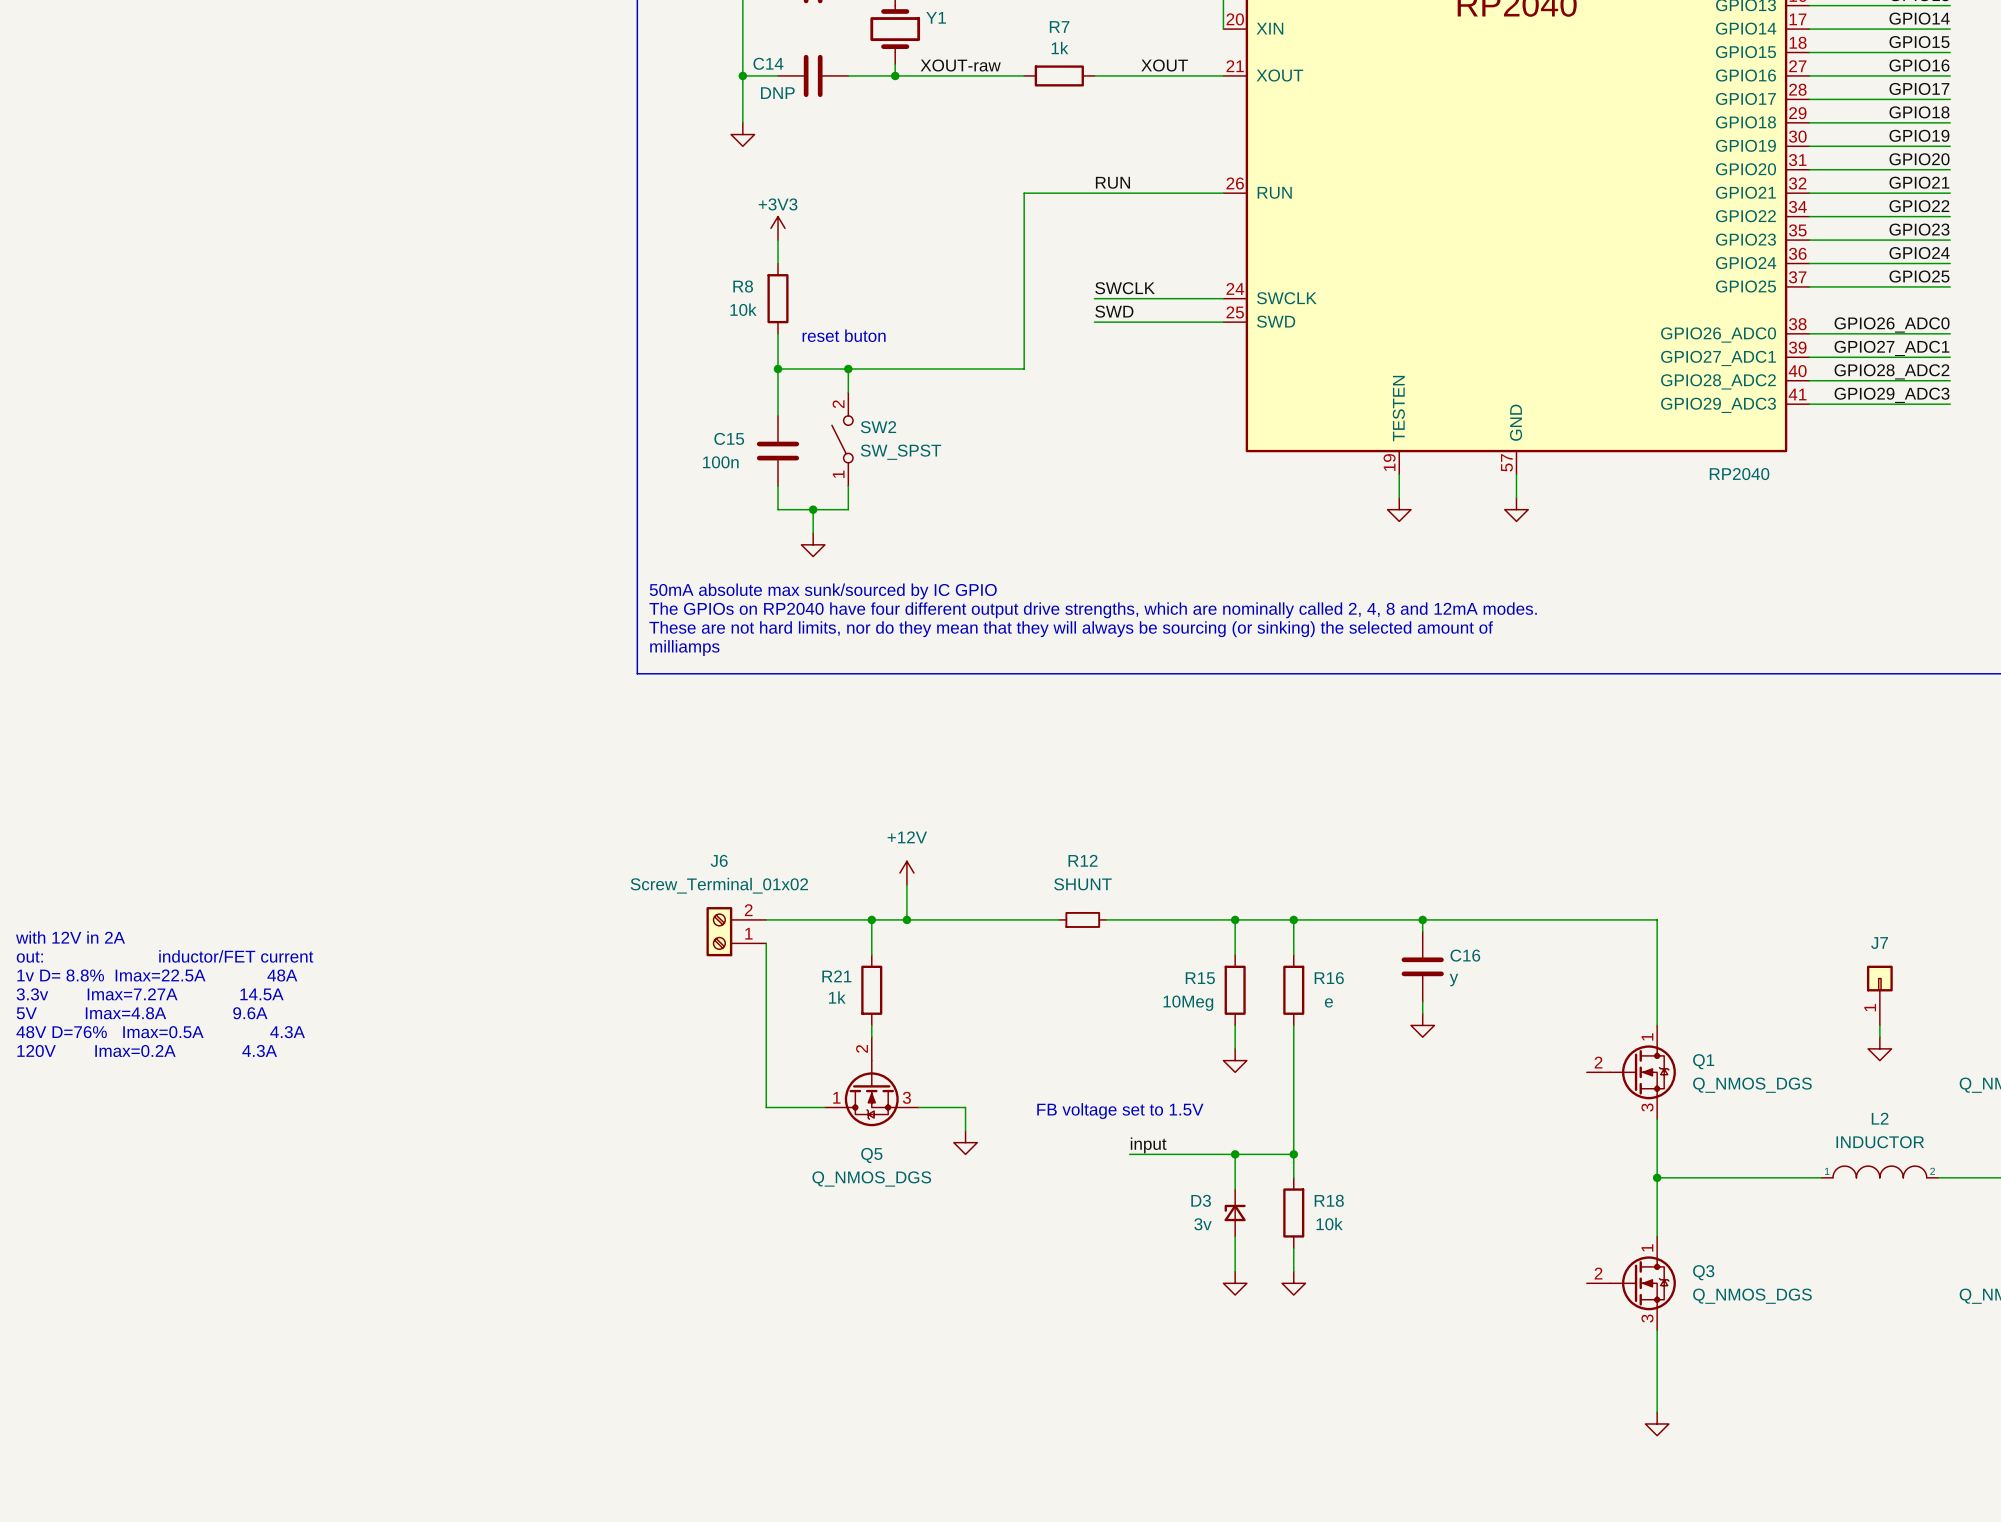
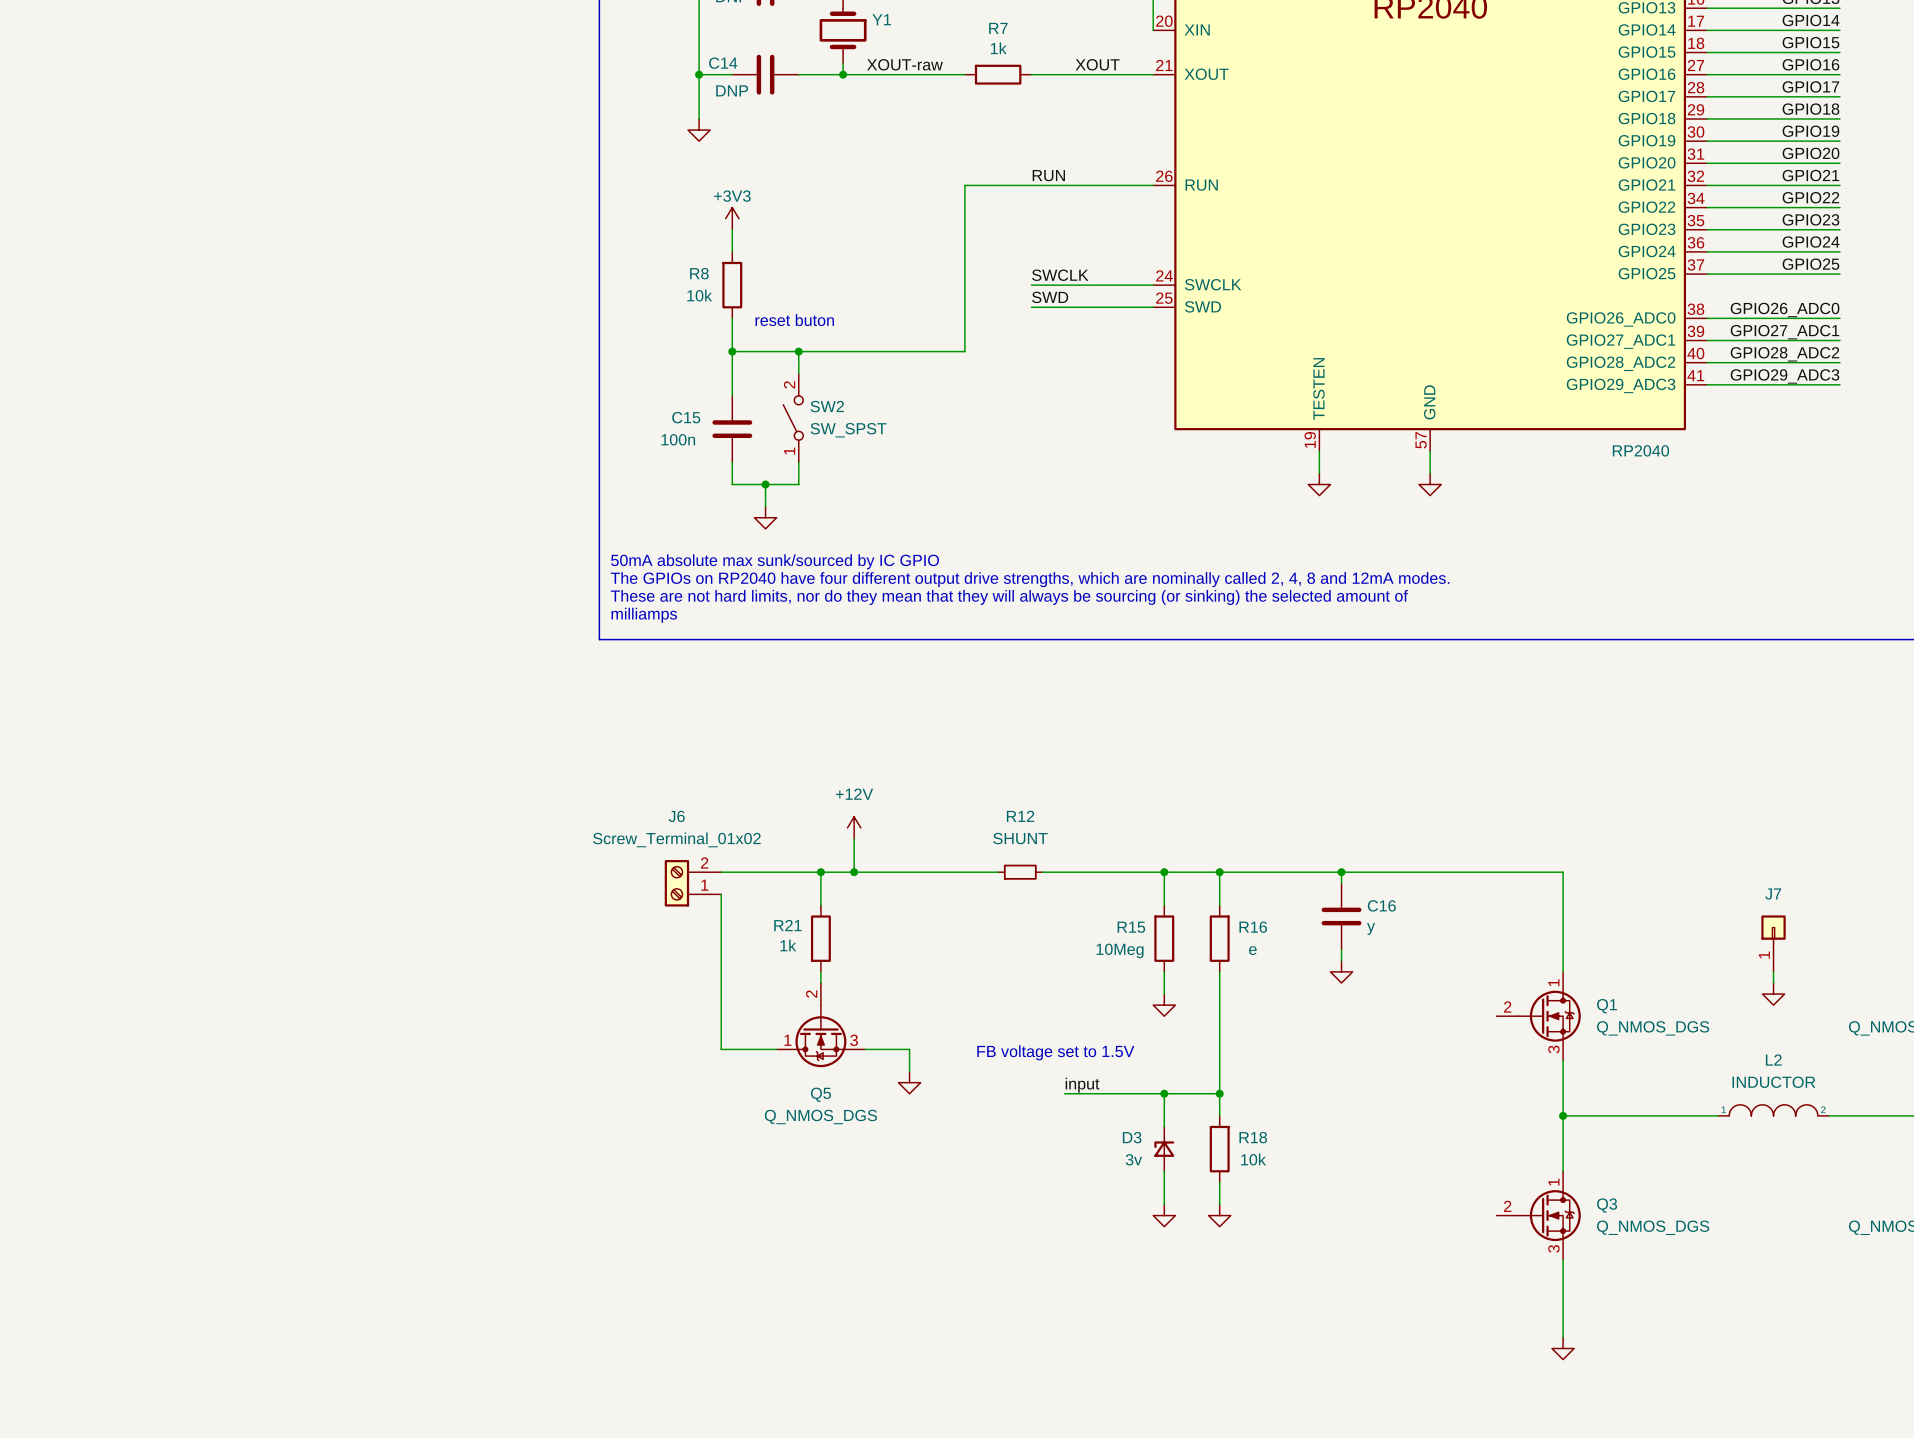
text: with 12V in 2A (70, 937) -> none
text: out: inductor/FET current (165, 956) -> none
text: 1v D= 8.8% Imax=22.5A 48A (157, 975) -> none
text: 3.3v Imax=7.27A 14.5A (150, 994) -> none
text: 5V Imax=4.8A 9.6A (142, 1013) -> none
text: 48V D=76% Imax=0.5A 4.3A (160, 1032) -> none
text: 120V Imax=0.2A 4.3A (147, 1051) -> none

